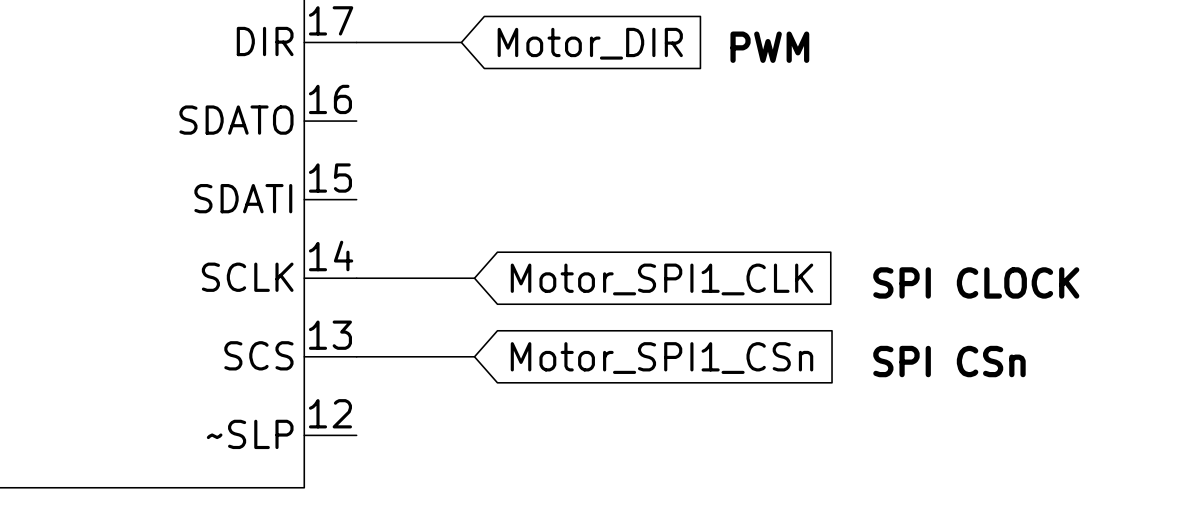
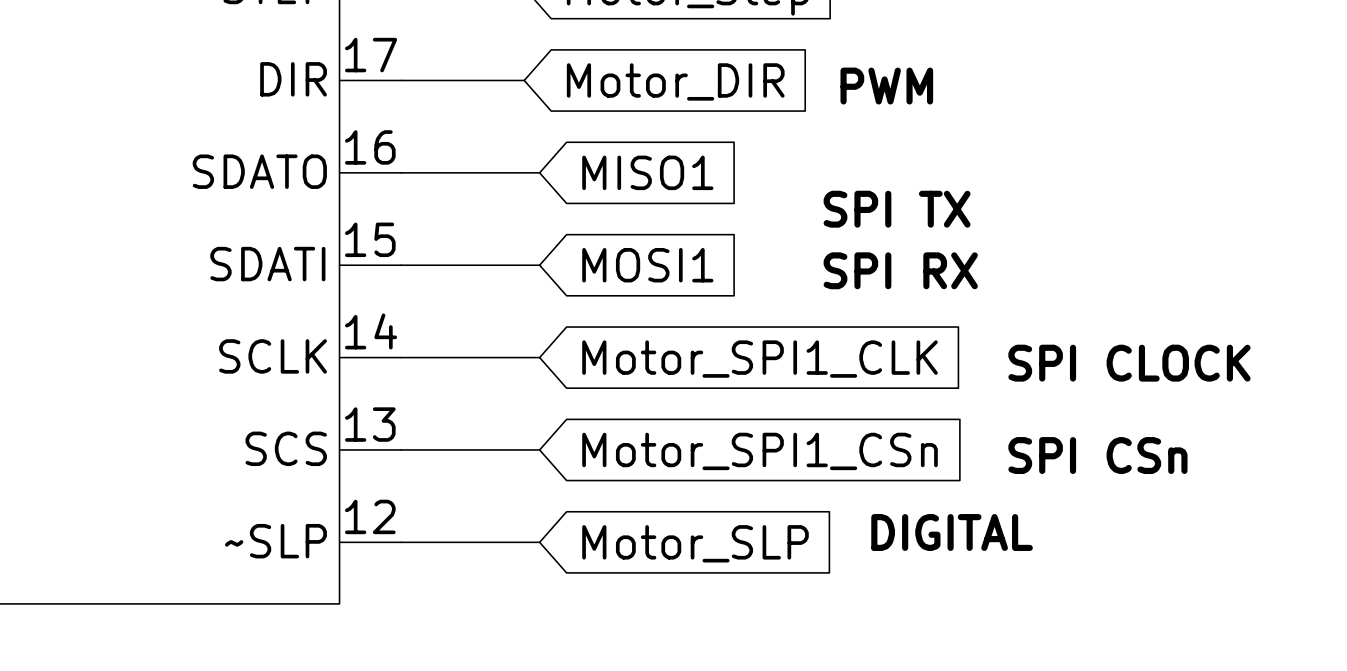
wire: none -> (401, 172) (539, 172)
global label: none -> MISO1 (647, 172)
text: none -> SPI TX (897, 209)
wire: none -> (401, 265) (539, 265)
global label: none -> MOSI1 (647, 265)
text: none -> SPI RX (900, 270)
text: none -> DIGITAL (952, 532)
wire: none -> (401, 542) (539, 542)
global label: none -> Motor_SLP (695, 543)

